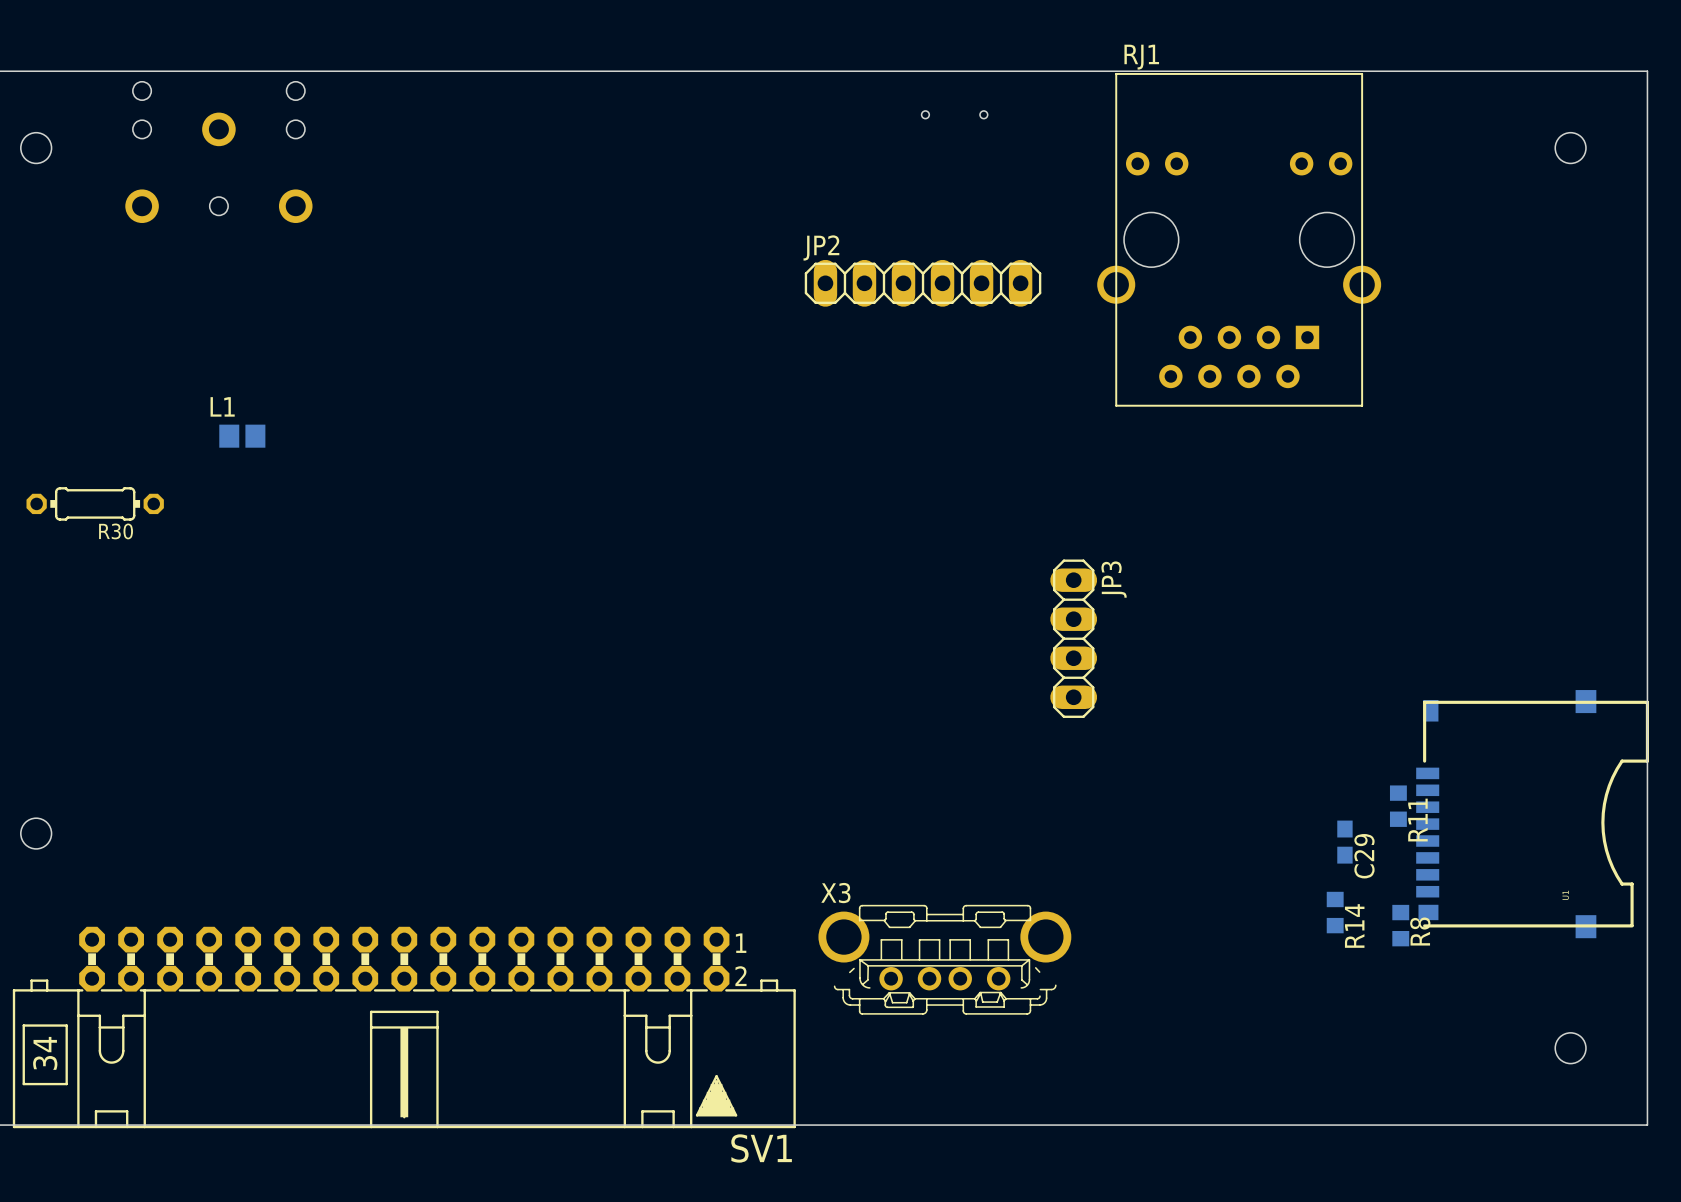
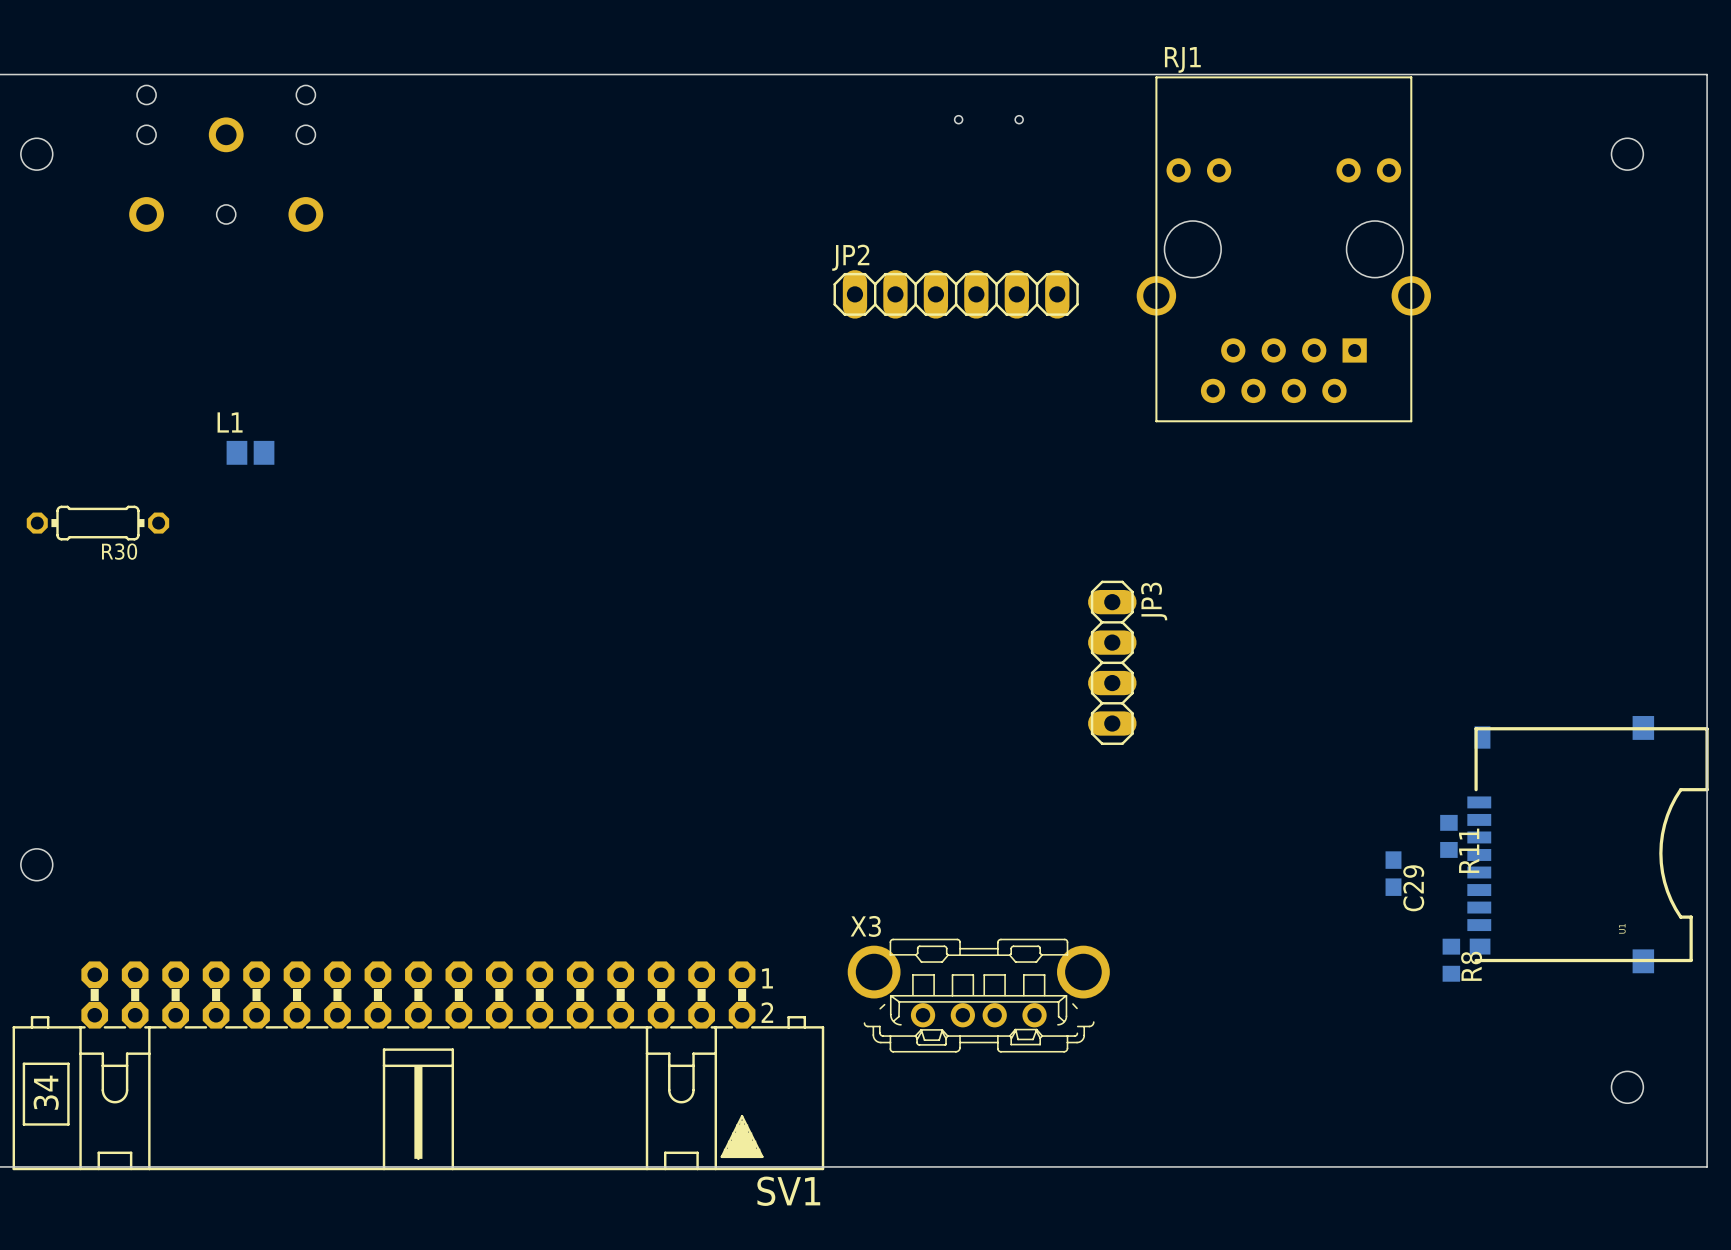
R14: (1335, 912) -> none

